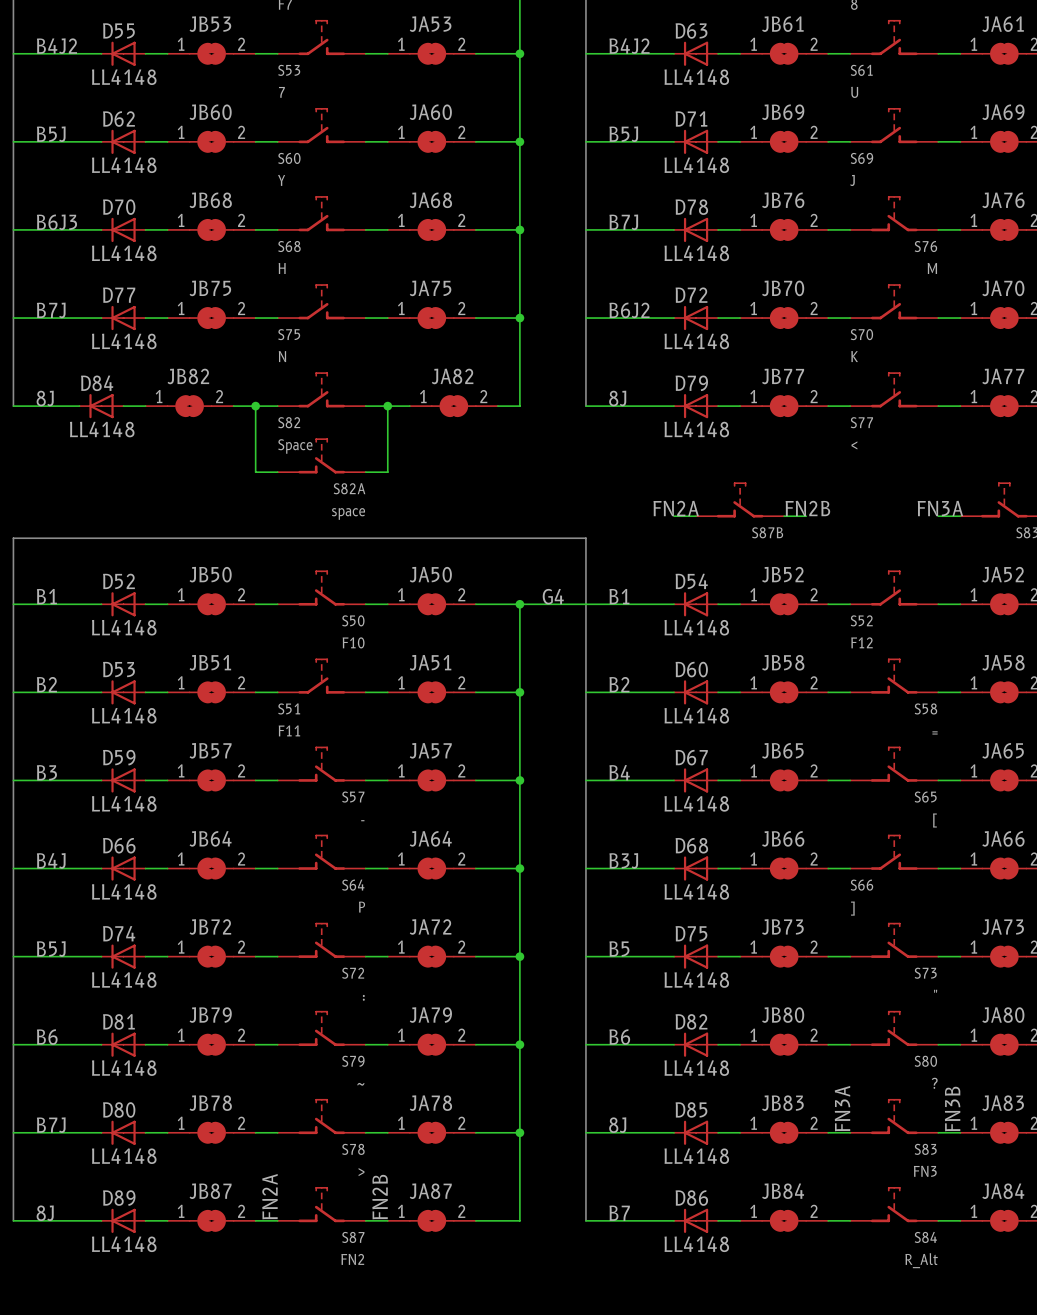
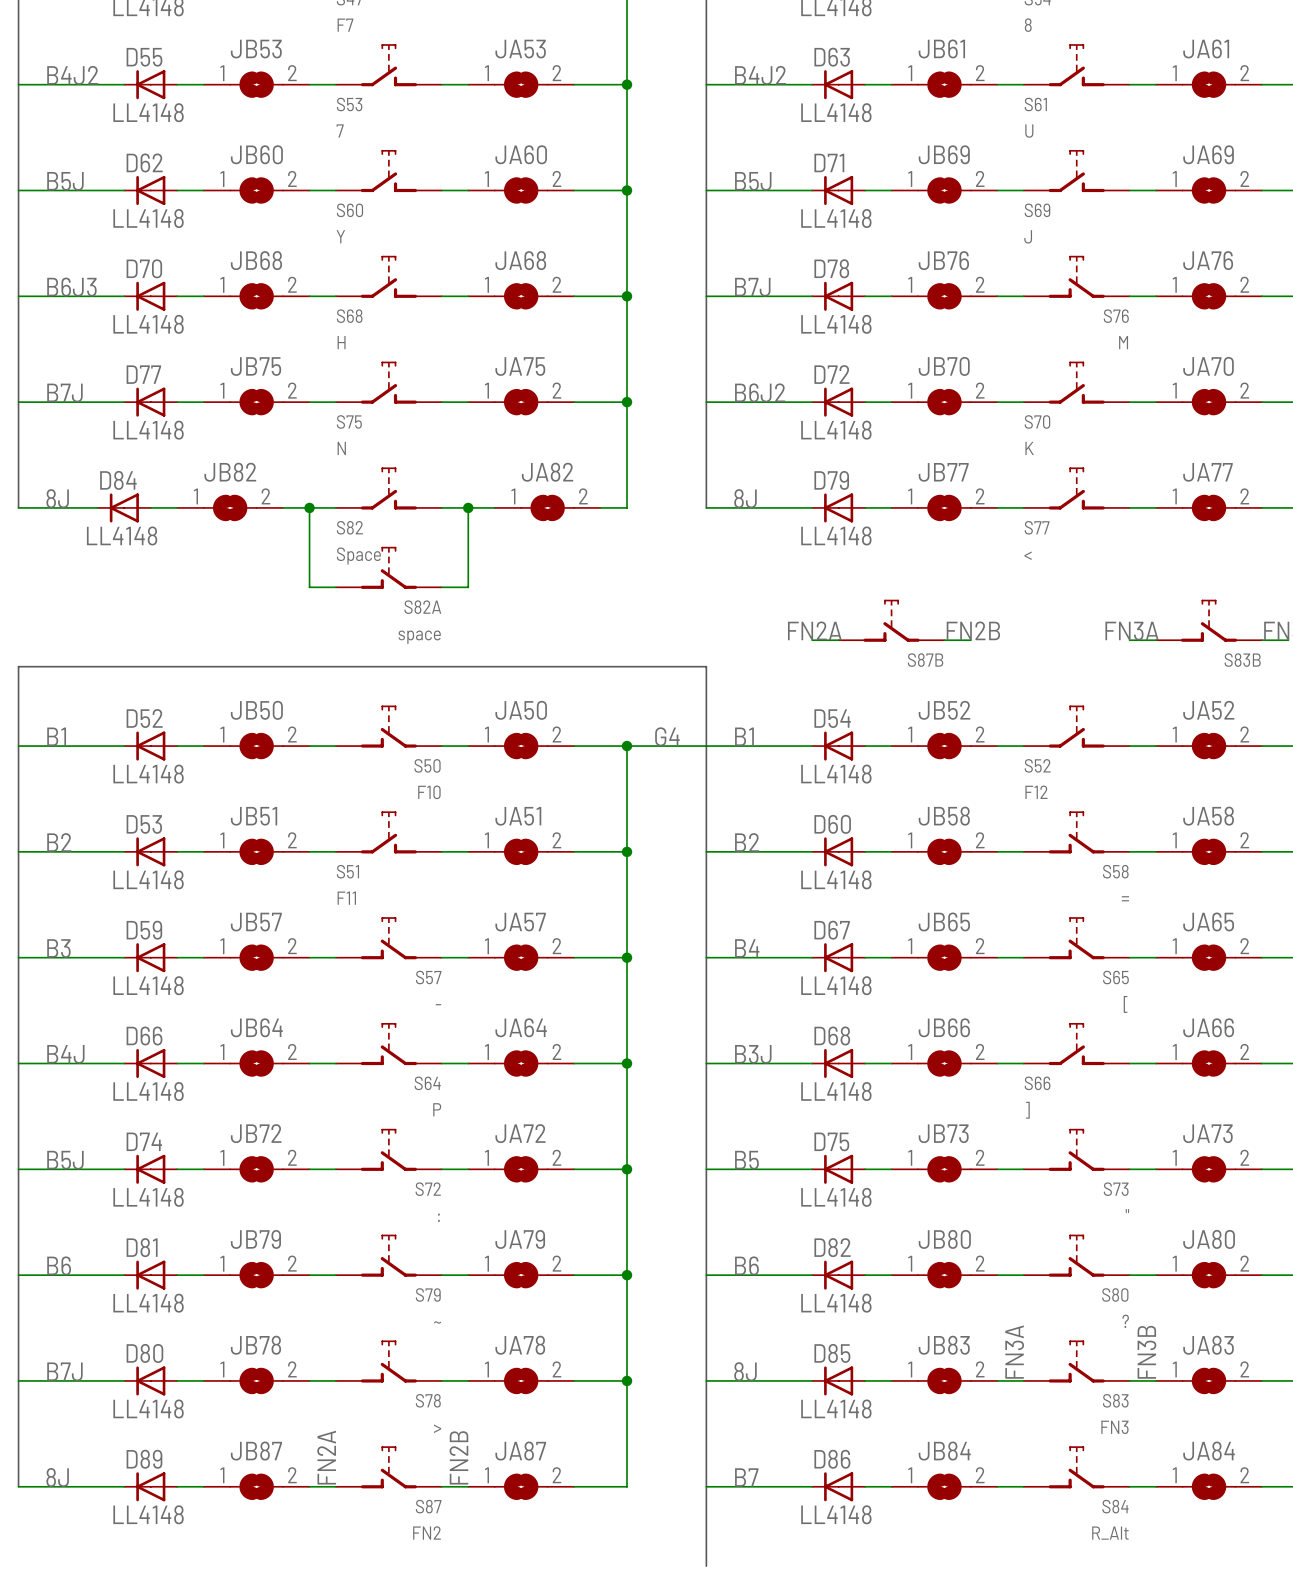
bus: none -> (706, 1486) (706, 1566)

